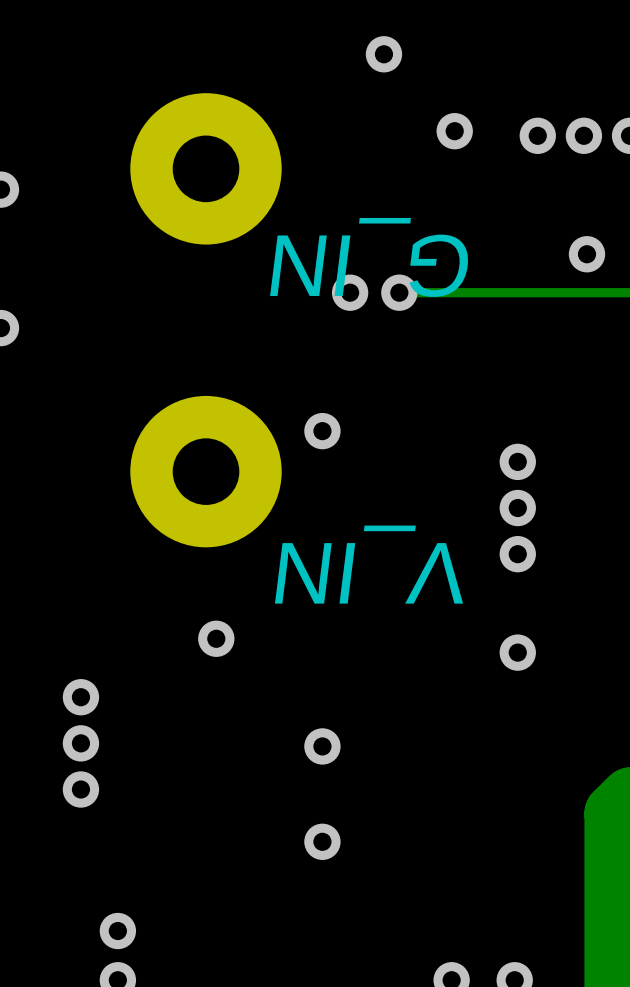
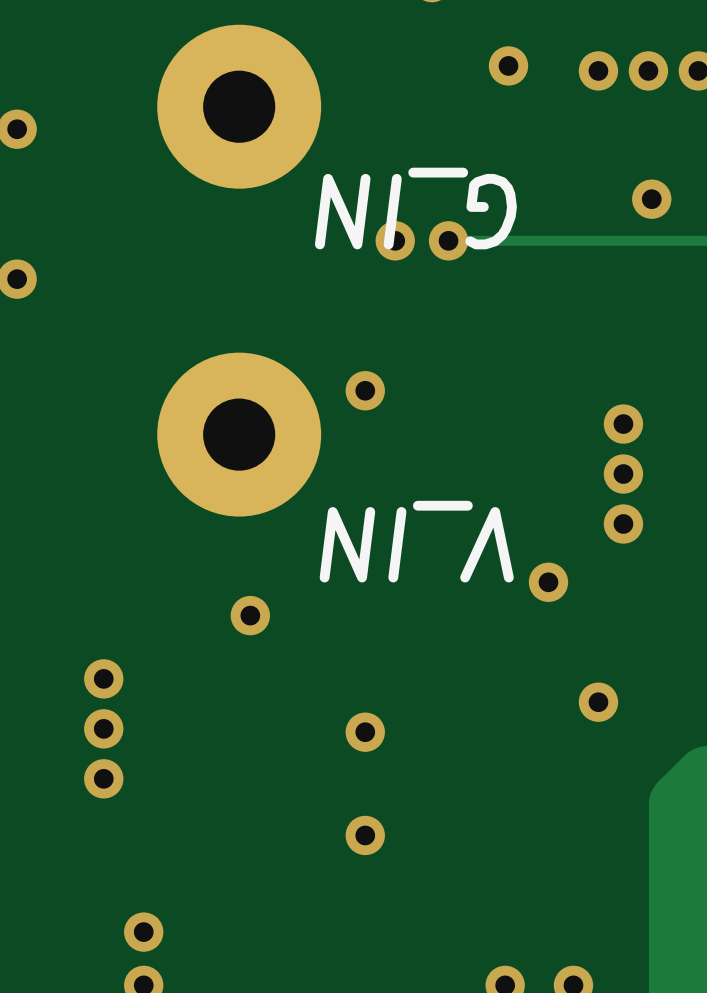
via: (517, 461) -> none
via: none -> (623, 424)
via: (517, 508) -> none
via: none -> (623, 474)
via: (517, 554) -> none
via: none -> (623, 523)
via: none -> (548, 582)
via: (517, 652) -> none
via: none -> (598, 702)

